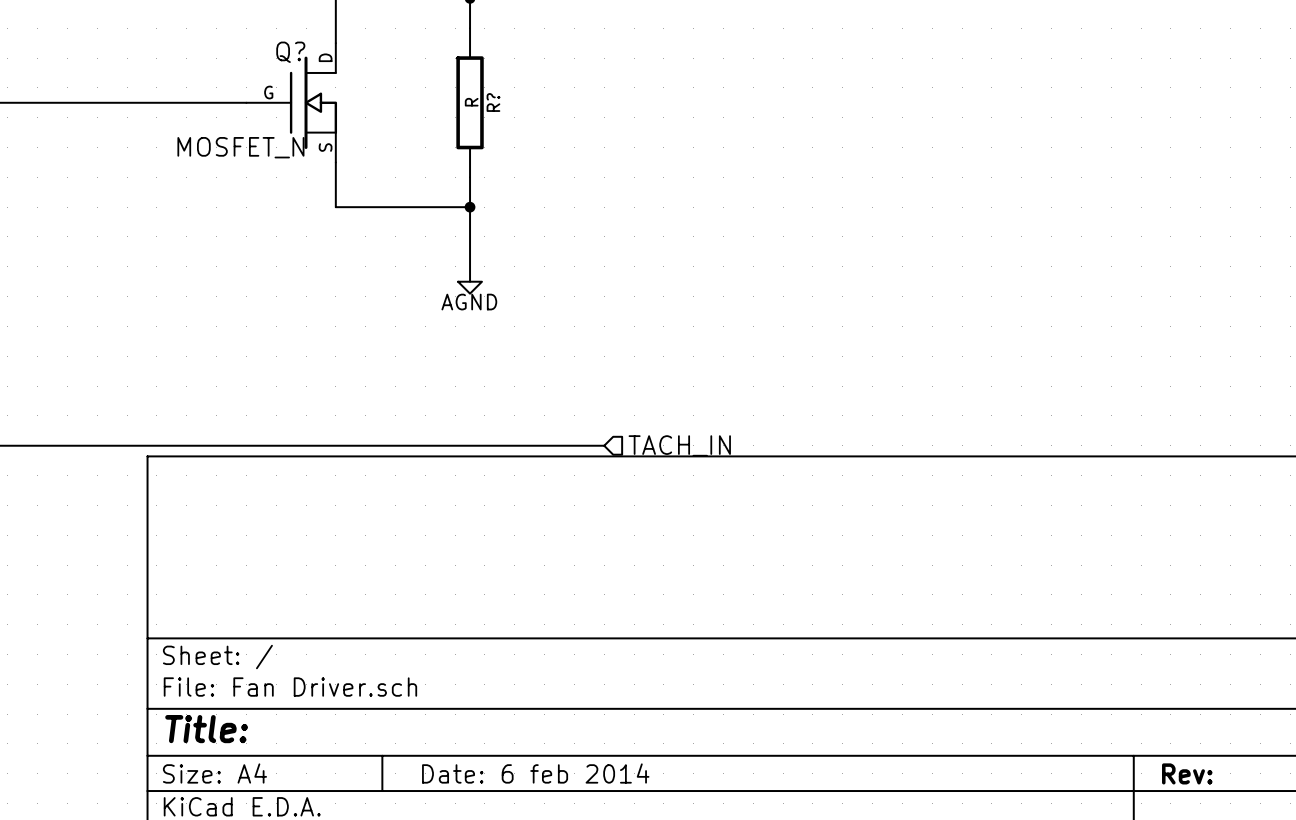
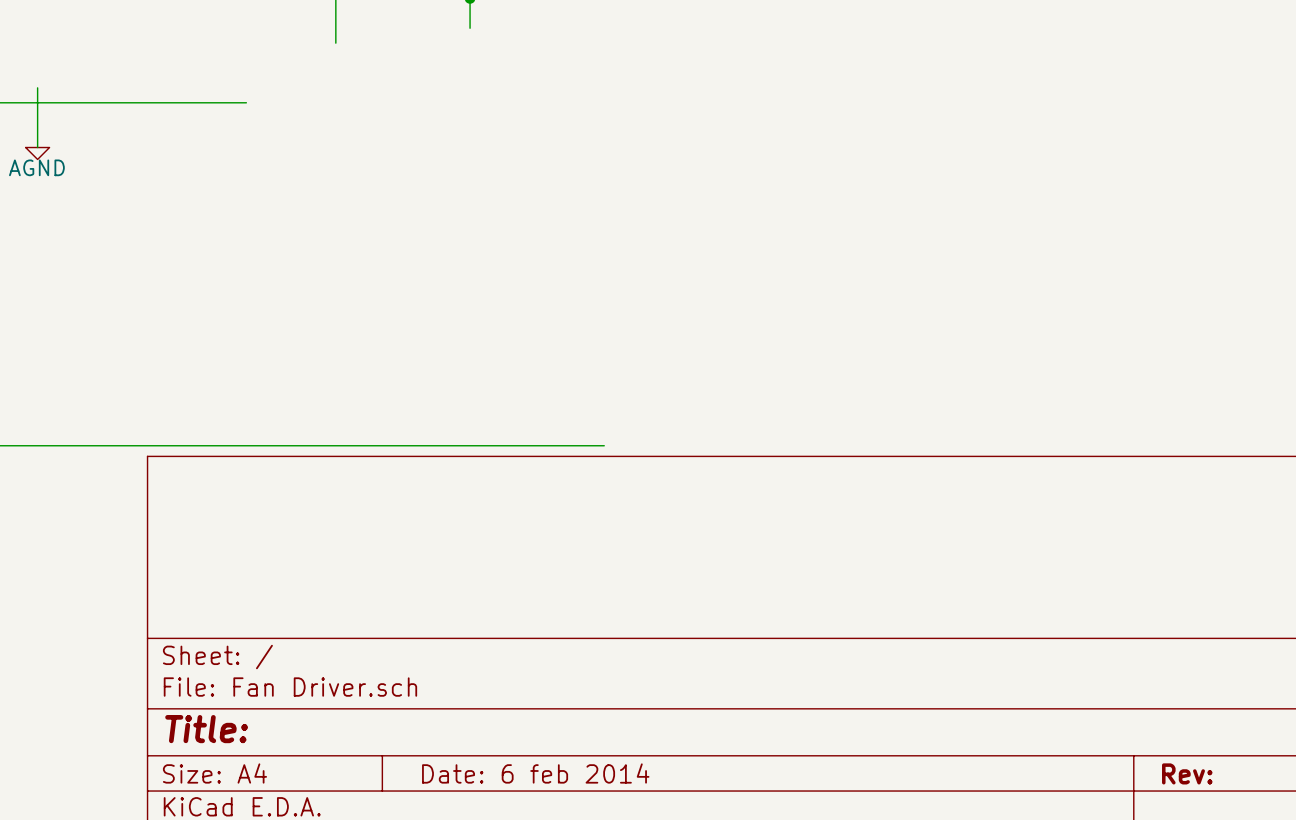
wire: none -> (37, 87) (37, 147)
Q?: MOSFET_N (291, 102) -> none
R?: R (470, 102) -> none
power symbol: none -> AGND (37, 153)
wire: (335, 162) (335, 207) (470, 207) -> none
wire: (470, 177) (470, 281) -> none
junction: (470, 207) -> none
power symbol: AGND (470, 287) -> none
hierarchical label: TACH_IN (679, 445) -> none

